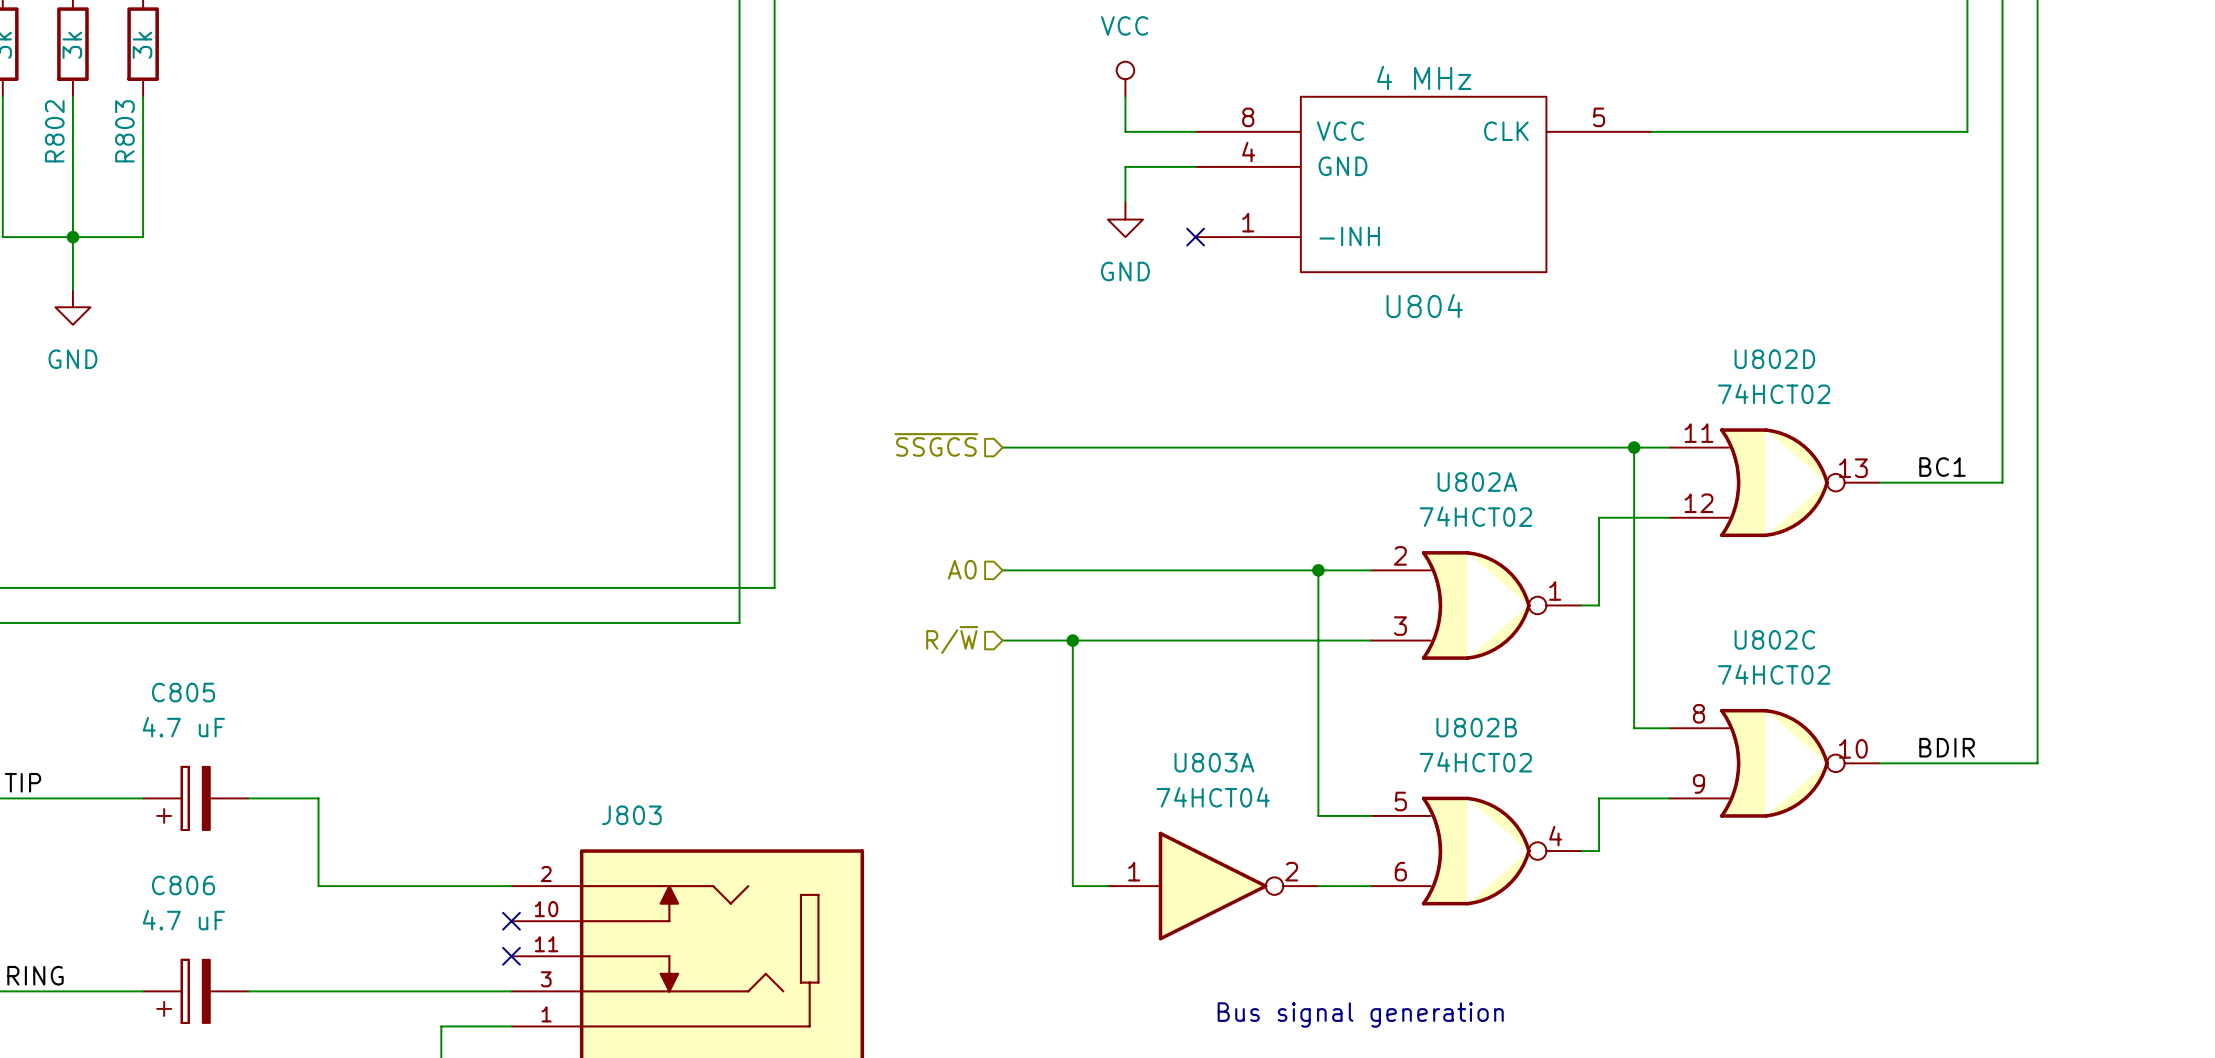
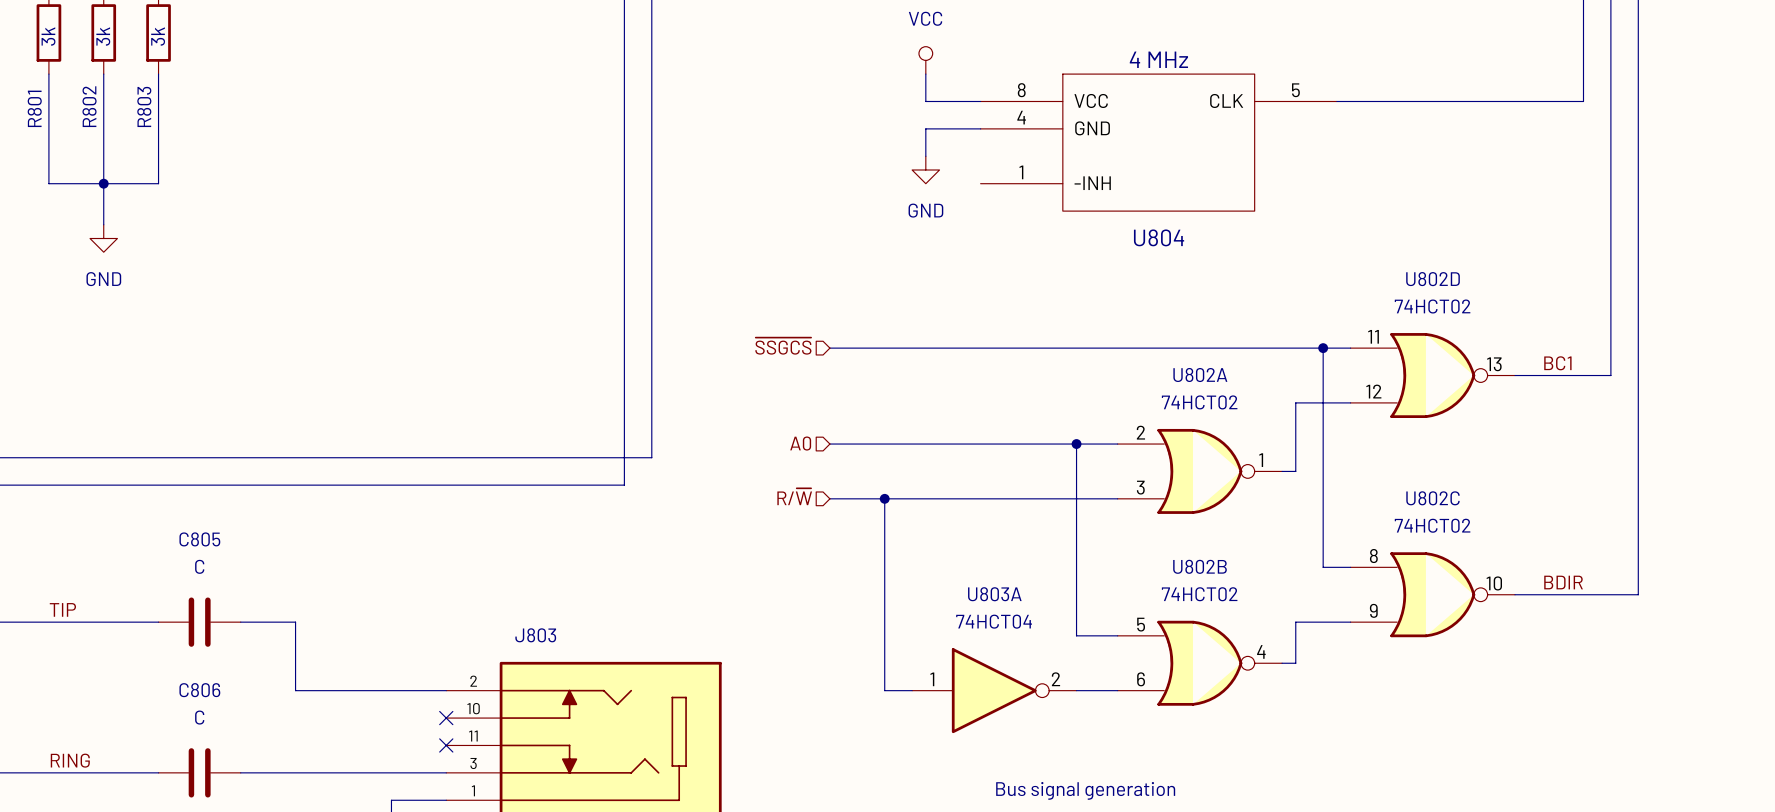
no-connect mark: (1195, 237) -> none
C805 value: 4.7 uF (183, 727) -> C (199, 566)
C805 symbol: [143, 766, 249, 830] -> [158, 597, 241, 647]
C806 value: 4.7 uF (183, 920) -> C (199, 717)
C806 symbol: [143, 959, 249, 1023] -> [158, 748, 241, 798]

